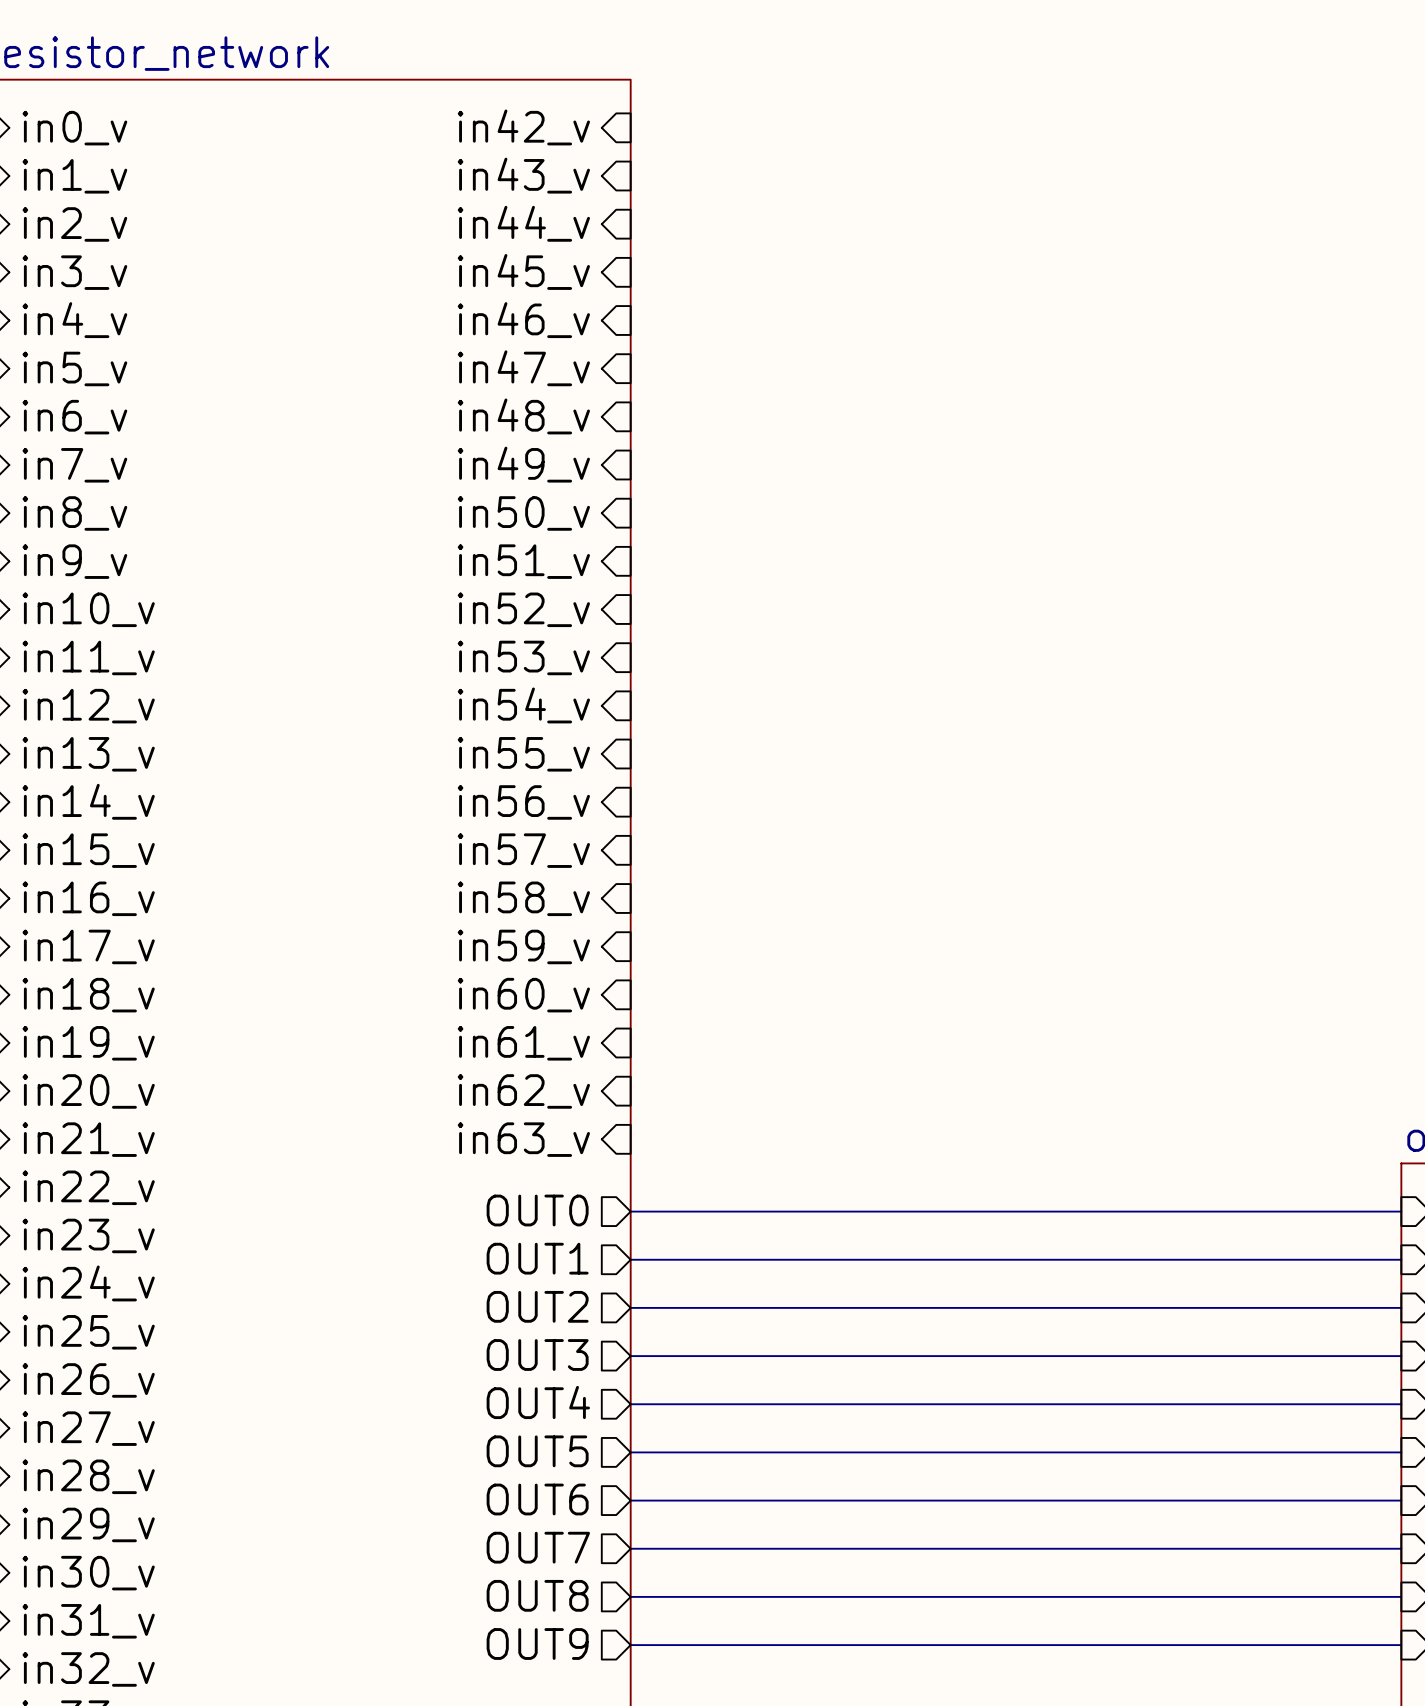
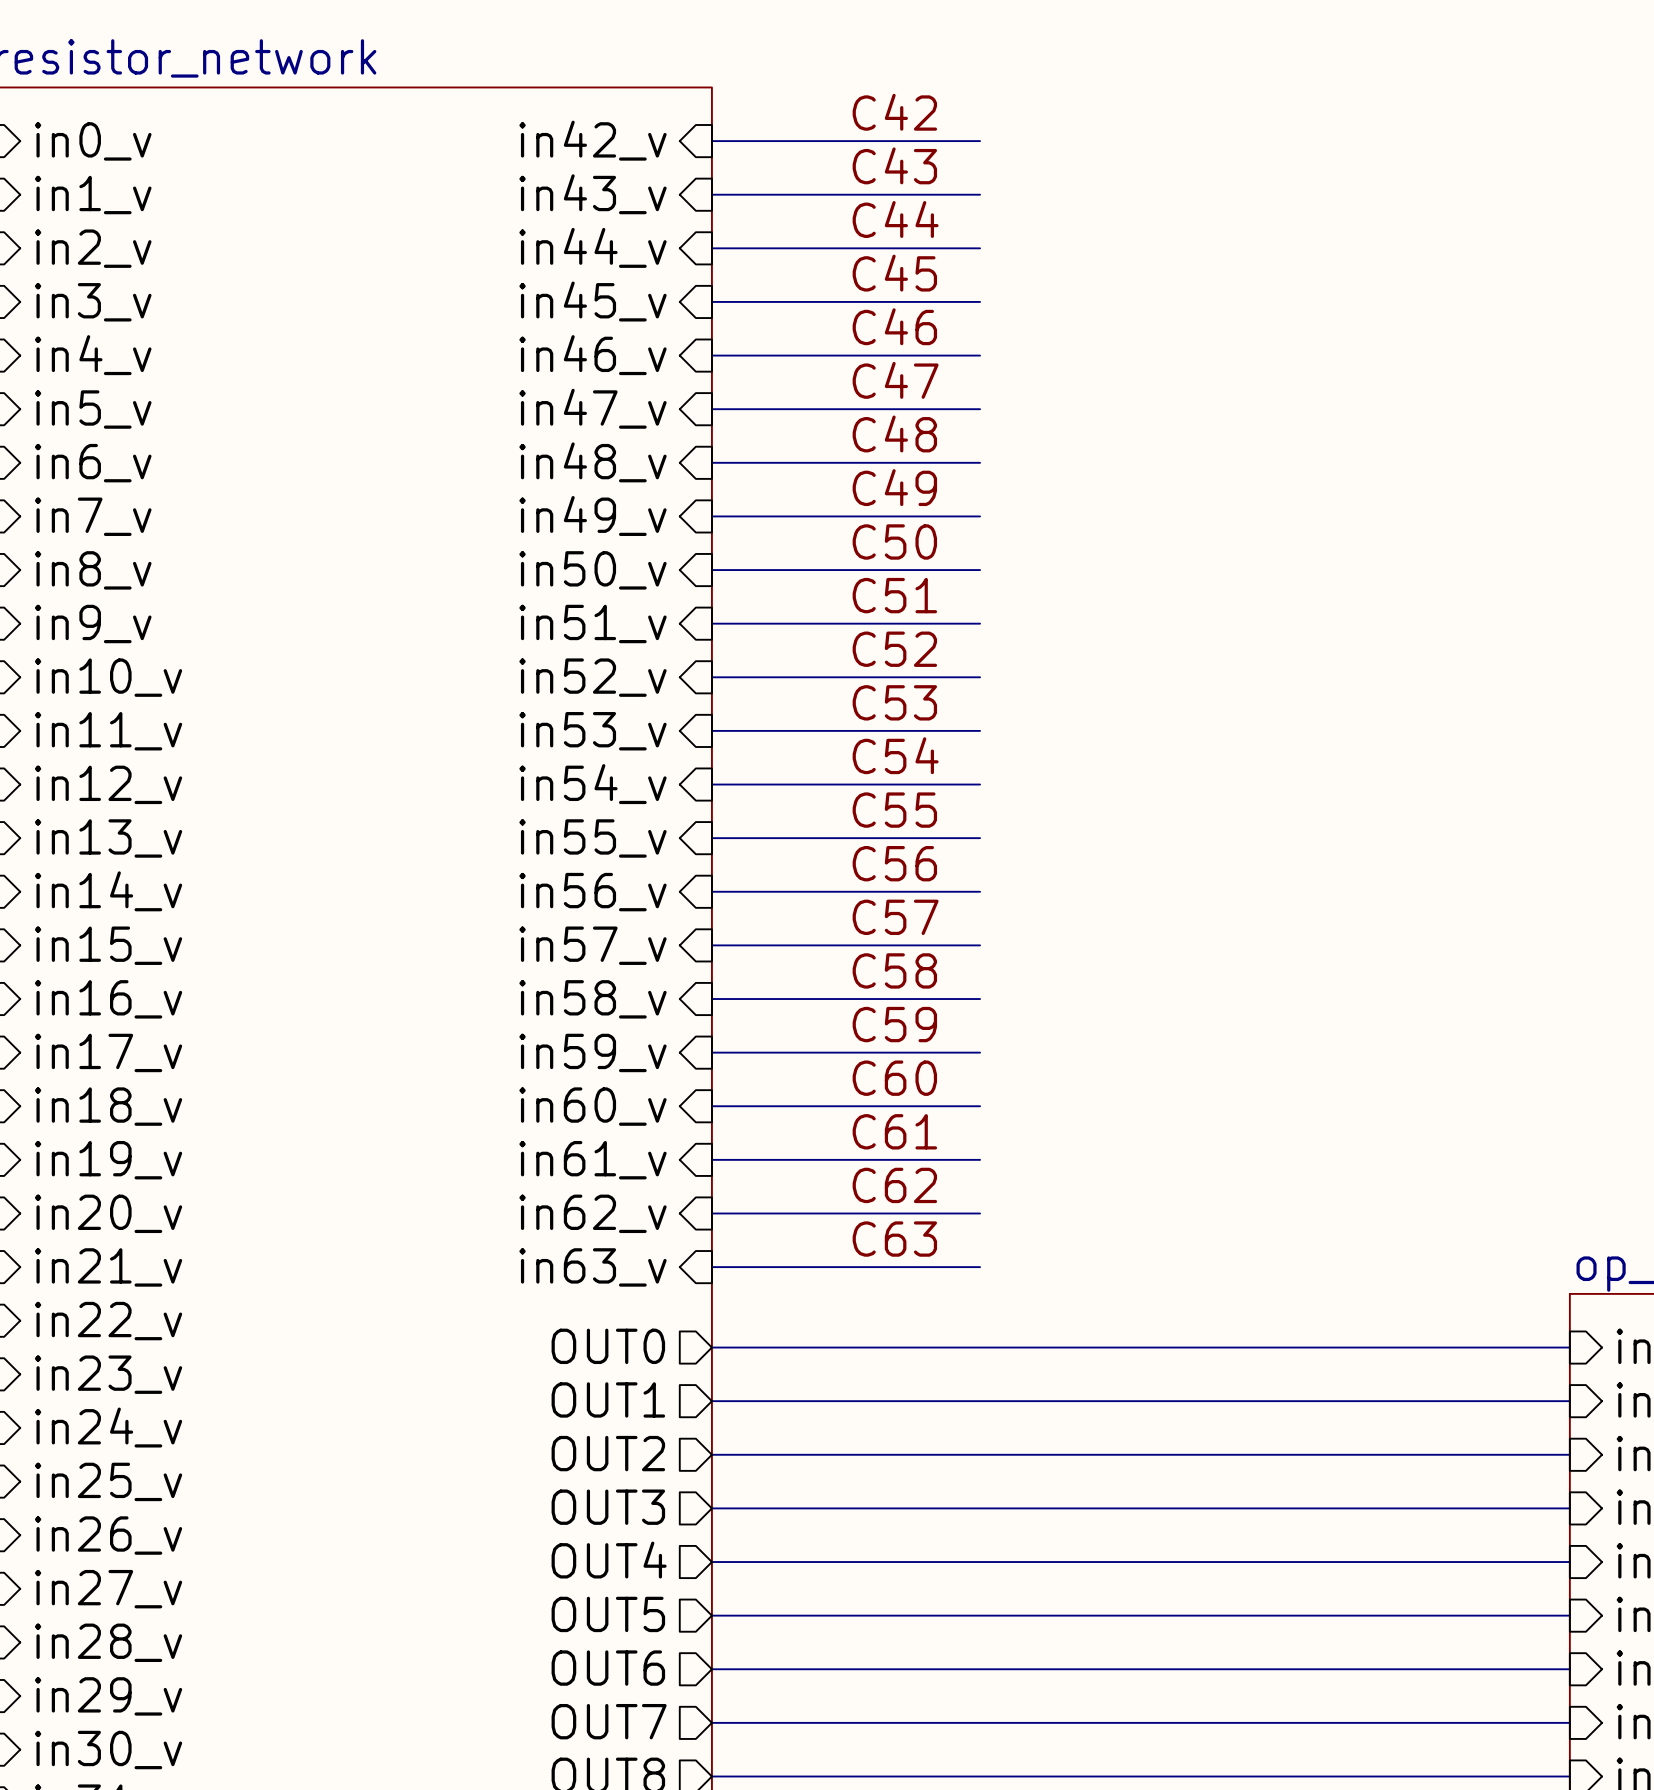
label: none -> C42 (894, 112)
wire: none -> (711, 141) (980, 141)
label: none -> C43 (894, 165)
wire: none -> (711, 194) (980, 194)
label: none -> C44 (895, 219)
wire: none -> (711, 248) (980, 248)
label: none -> C45 (894, 273)
wire: none -> (711, 301) (980, 301)
label: none -> C46 (894, 326)
wire: none -> (711, 355) (980, 355)
label: none -> C47 (895, 380)
wire: none -> (711, 409) (980, 409)
label: none -> C48 (894, 433)
wire: none -> (711, 462) (980, 462)
label: none -> C49 (894, 487)
wire: none -> (711, 516) (980, 516)
label: none -> C50 (894, 541)
wire: none -> (711, 570) (980, 570)
label: none -> C51 (894, 595)
wire: none -> (711, 623) (980, 623)
label: none -> C52 (894, 649)
wire: none -> (711, 677) (980, 677)
label: none -> C53 (894, 702)
wire: none -> (711, 730) (980, 730)
label: none -> C54 (895, 755)
wire: none -> (711, 784) (980, 784)
label: none -> C55 (894, 810)
wire: none -> (711, 838) (980, 838)
label: none -> C56 (894, 863)
wire: none -> (711, 891) (980, 891)
label: none -> C57 (895, 917)
wire: none -> (711, 945) (980, 945)
label: none -> C58 (894, 970)
wire: none -> (711, 999) (980, 999)
label: none -> C59 (894, 1024)
wire: none -> (711, 1052) (980, 1052)
label: none -> C60 (894, 1078)
wire: none -> (711, 1106) (980, 1106)
label: none -> C61 (894, 1131)
wire: none -> (711, 1159) (980, 1159)
label: none -> C62 (894, 1185)
wire: none -> (711, 1213) (980, 1213)
label: none -> C63 (894, 1239)
wire: none -> (711, 1267) (980, 1267)

